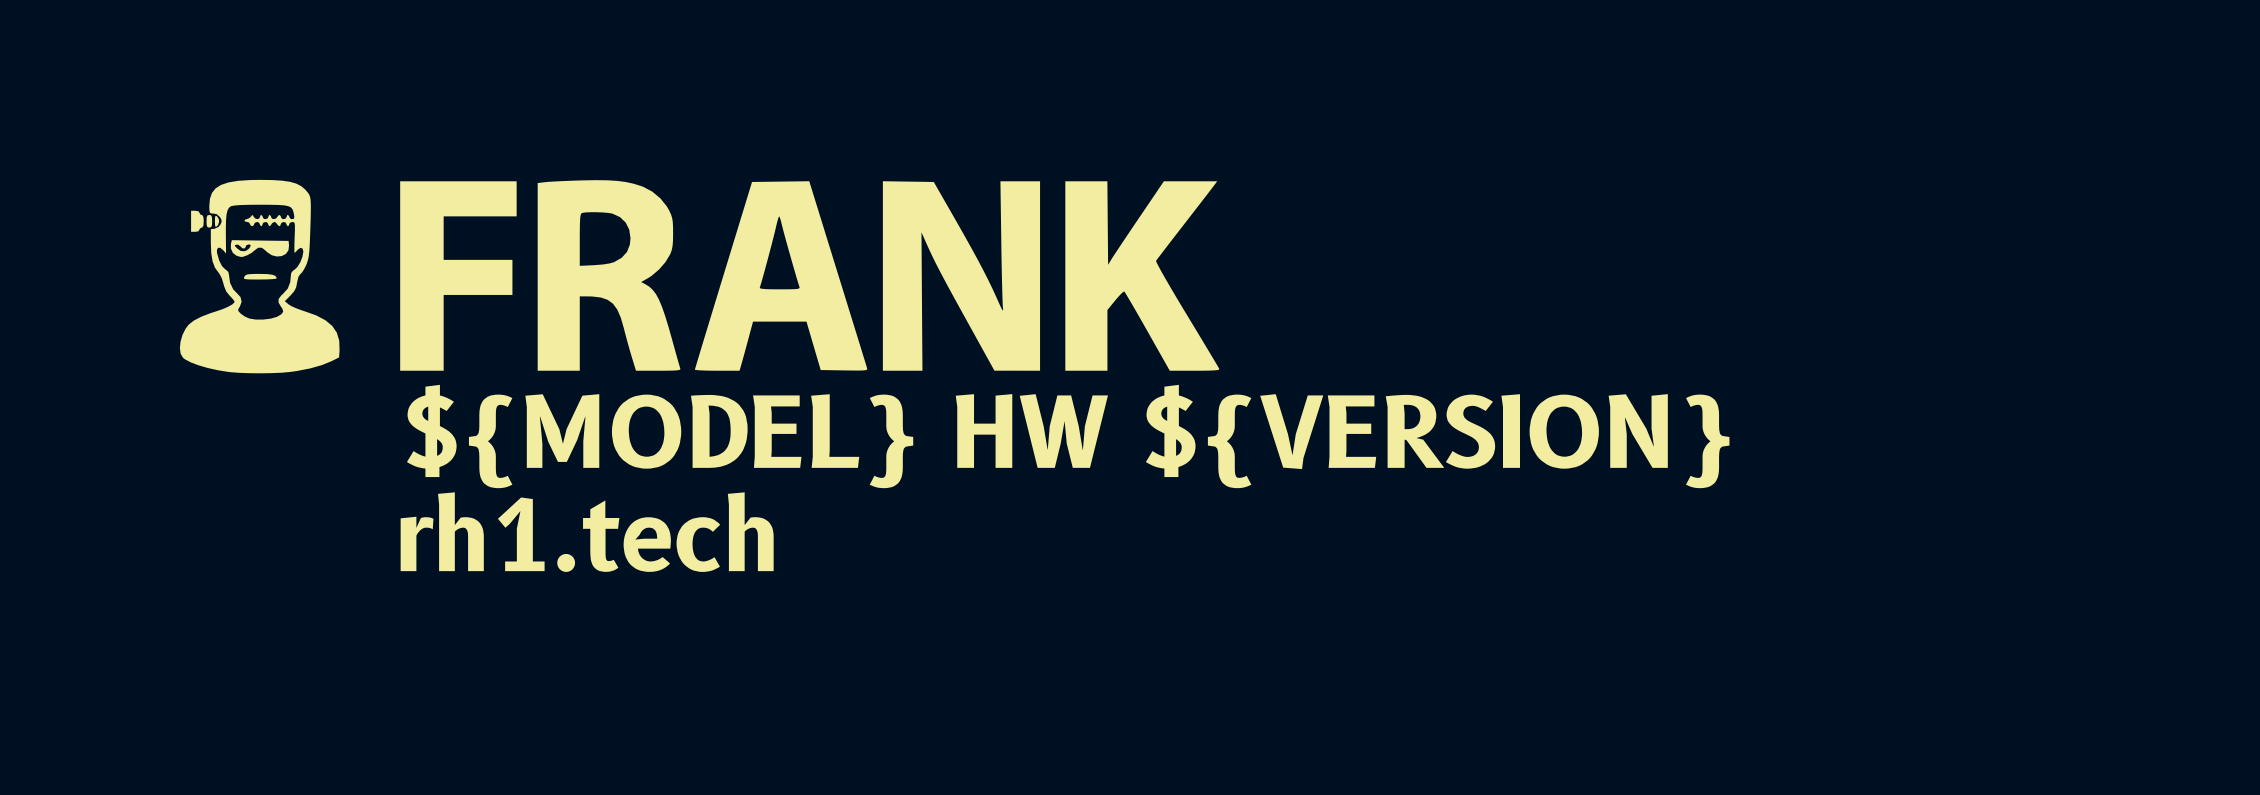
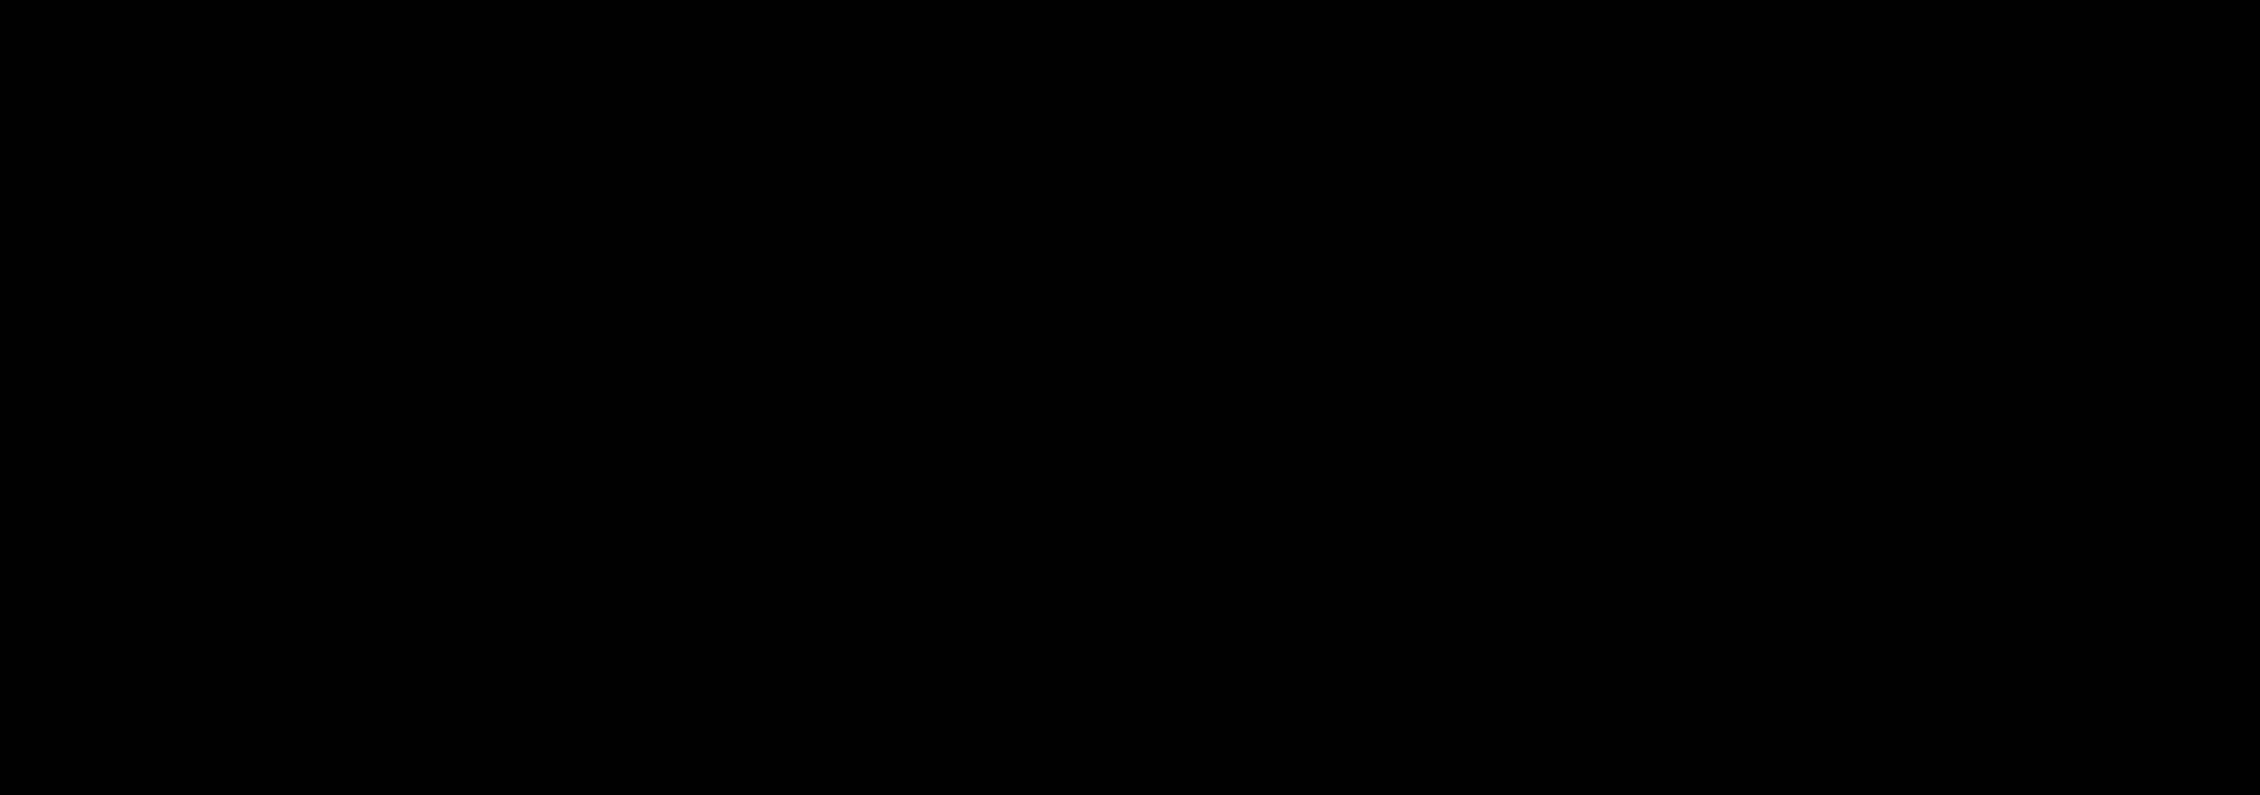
drawing: [179, 179, 1220, 374] -> none
text: ${MODEL} HW ${VERSION} (1068, 436) -> none
text: rh1.tech (587, 532) -> none

